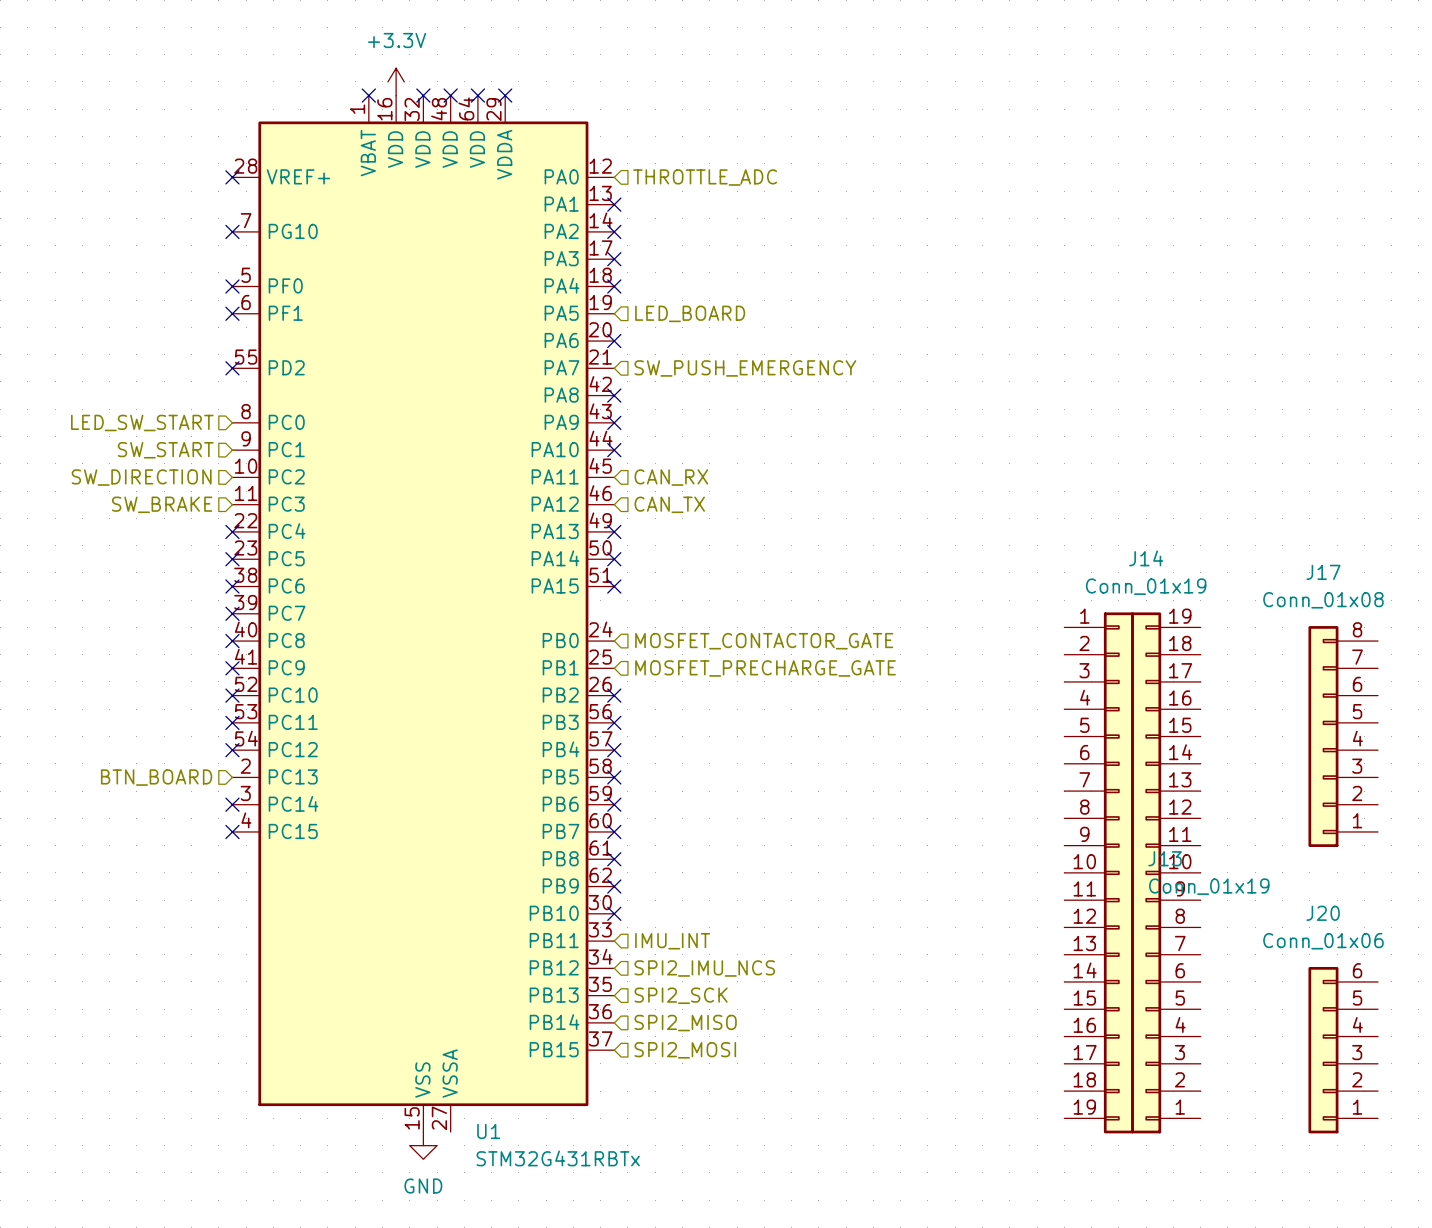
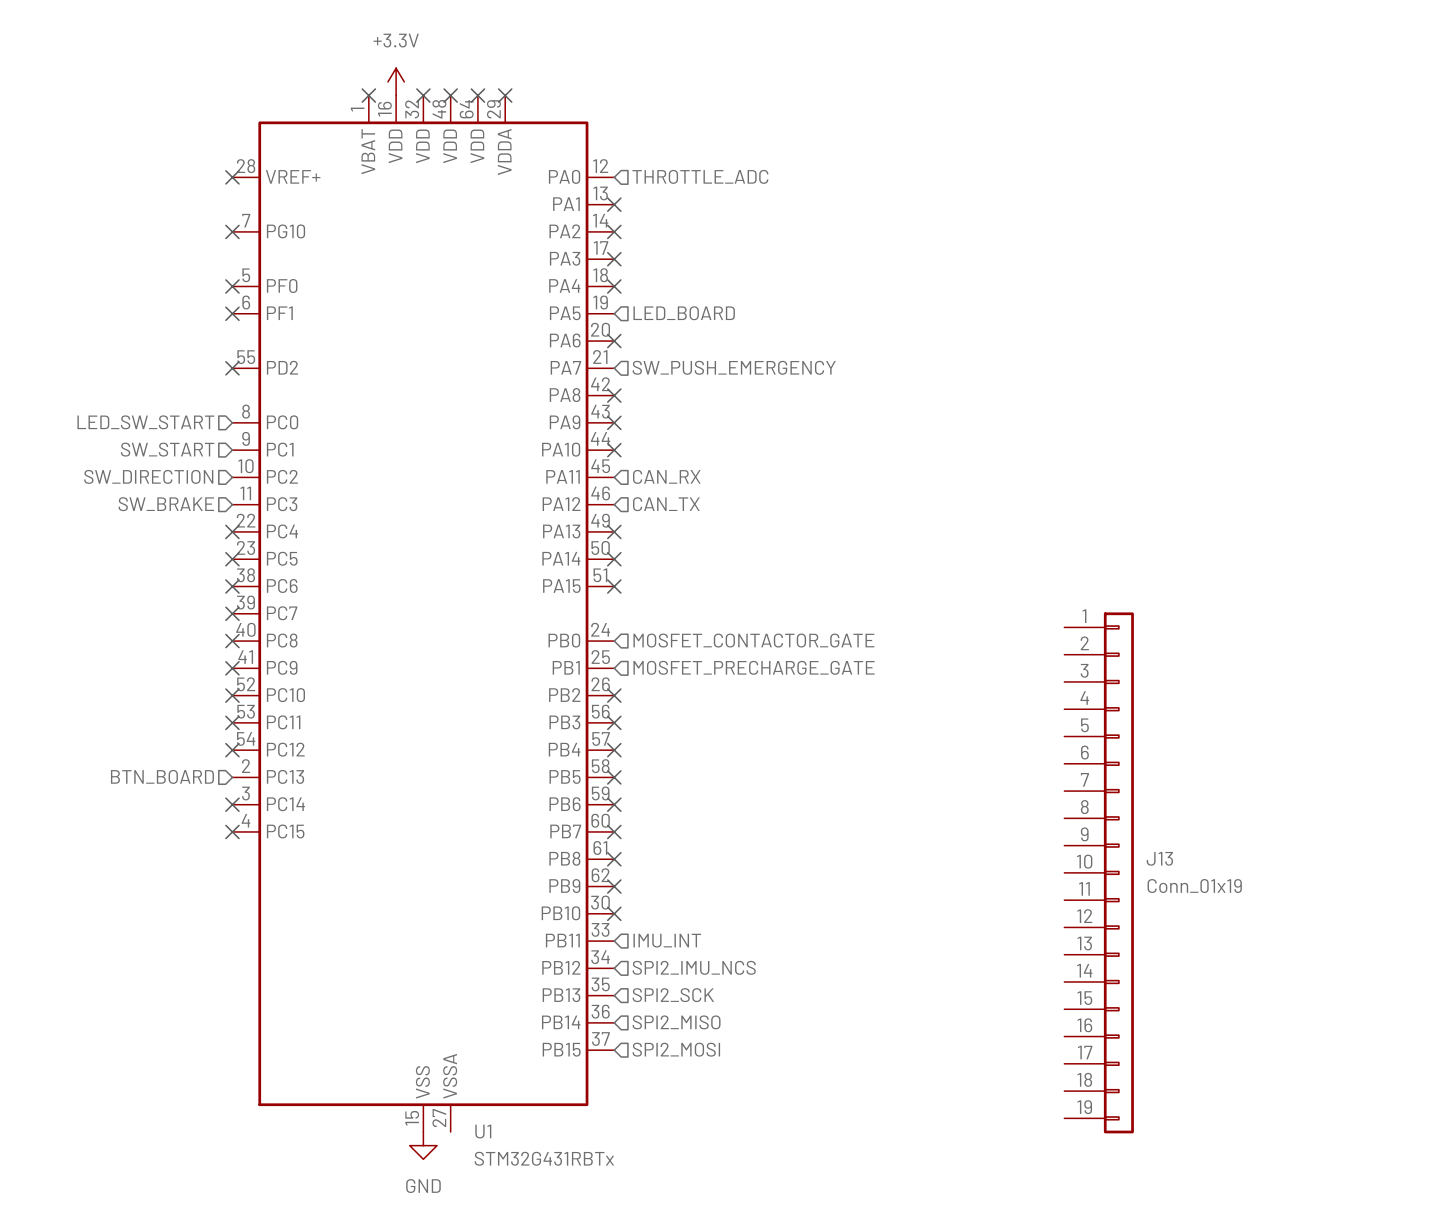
J17: Conn_01x08 (1343, 736) -> none
J14: Conn_01x19 (1165, 872) -> none
J20: Conn_01x06 (1343, 1050) -> none

